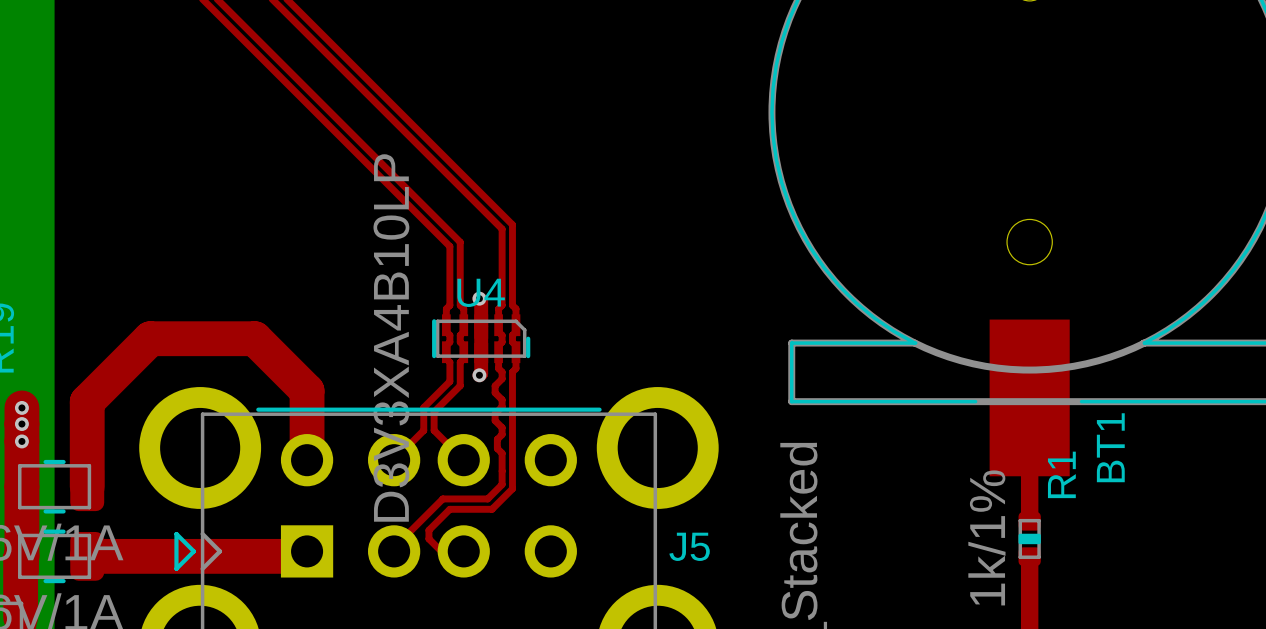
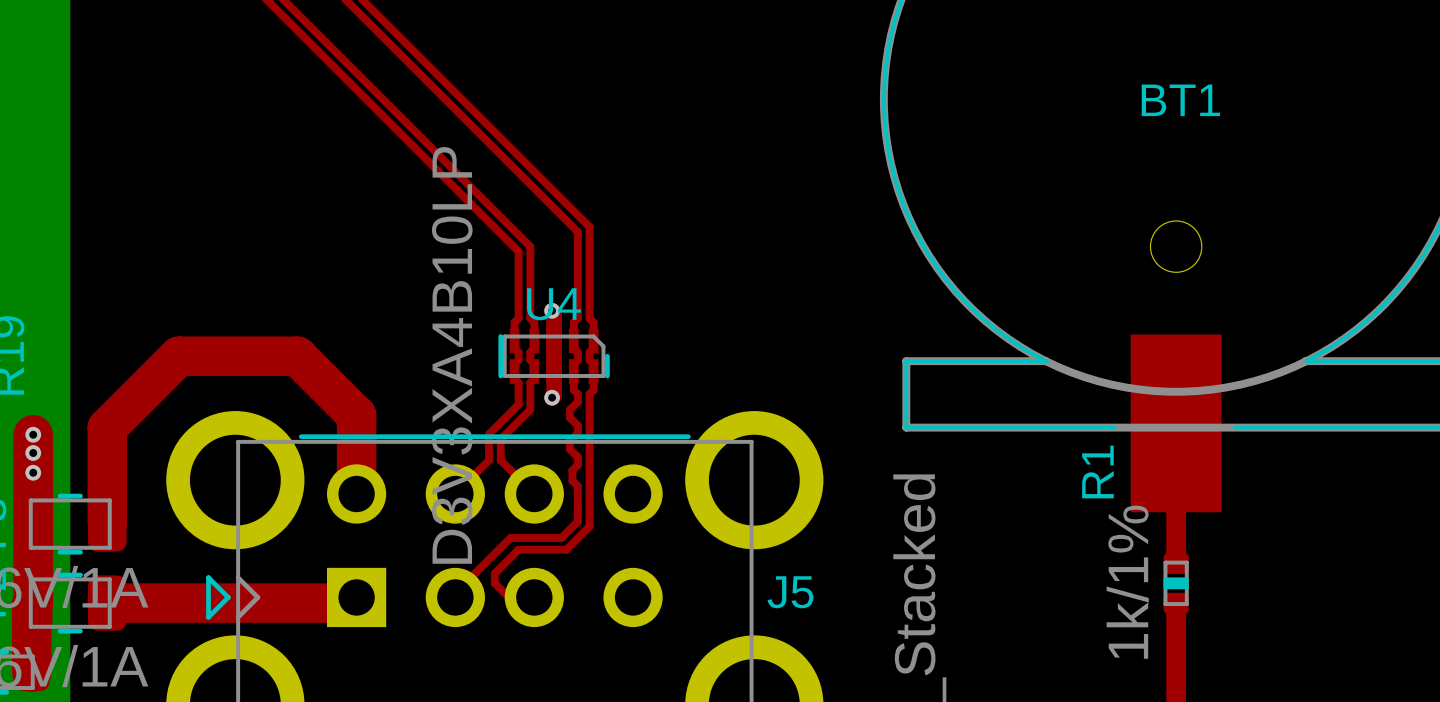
BT1 name rotation: 0° (1110, 447) -> 90° clockwise (1180, 100)
BT1 name position: BT1 (1110, 447) -> BT1 (1180, 100)
R1 name position: R1 (1061, 474) -> R1 (1097, 471)

